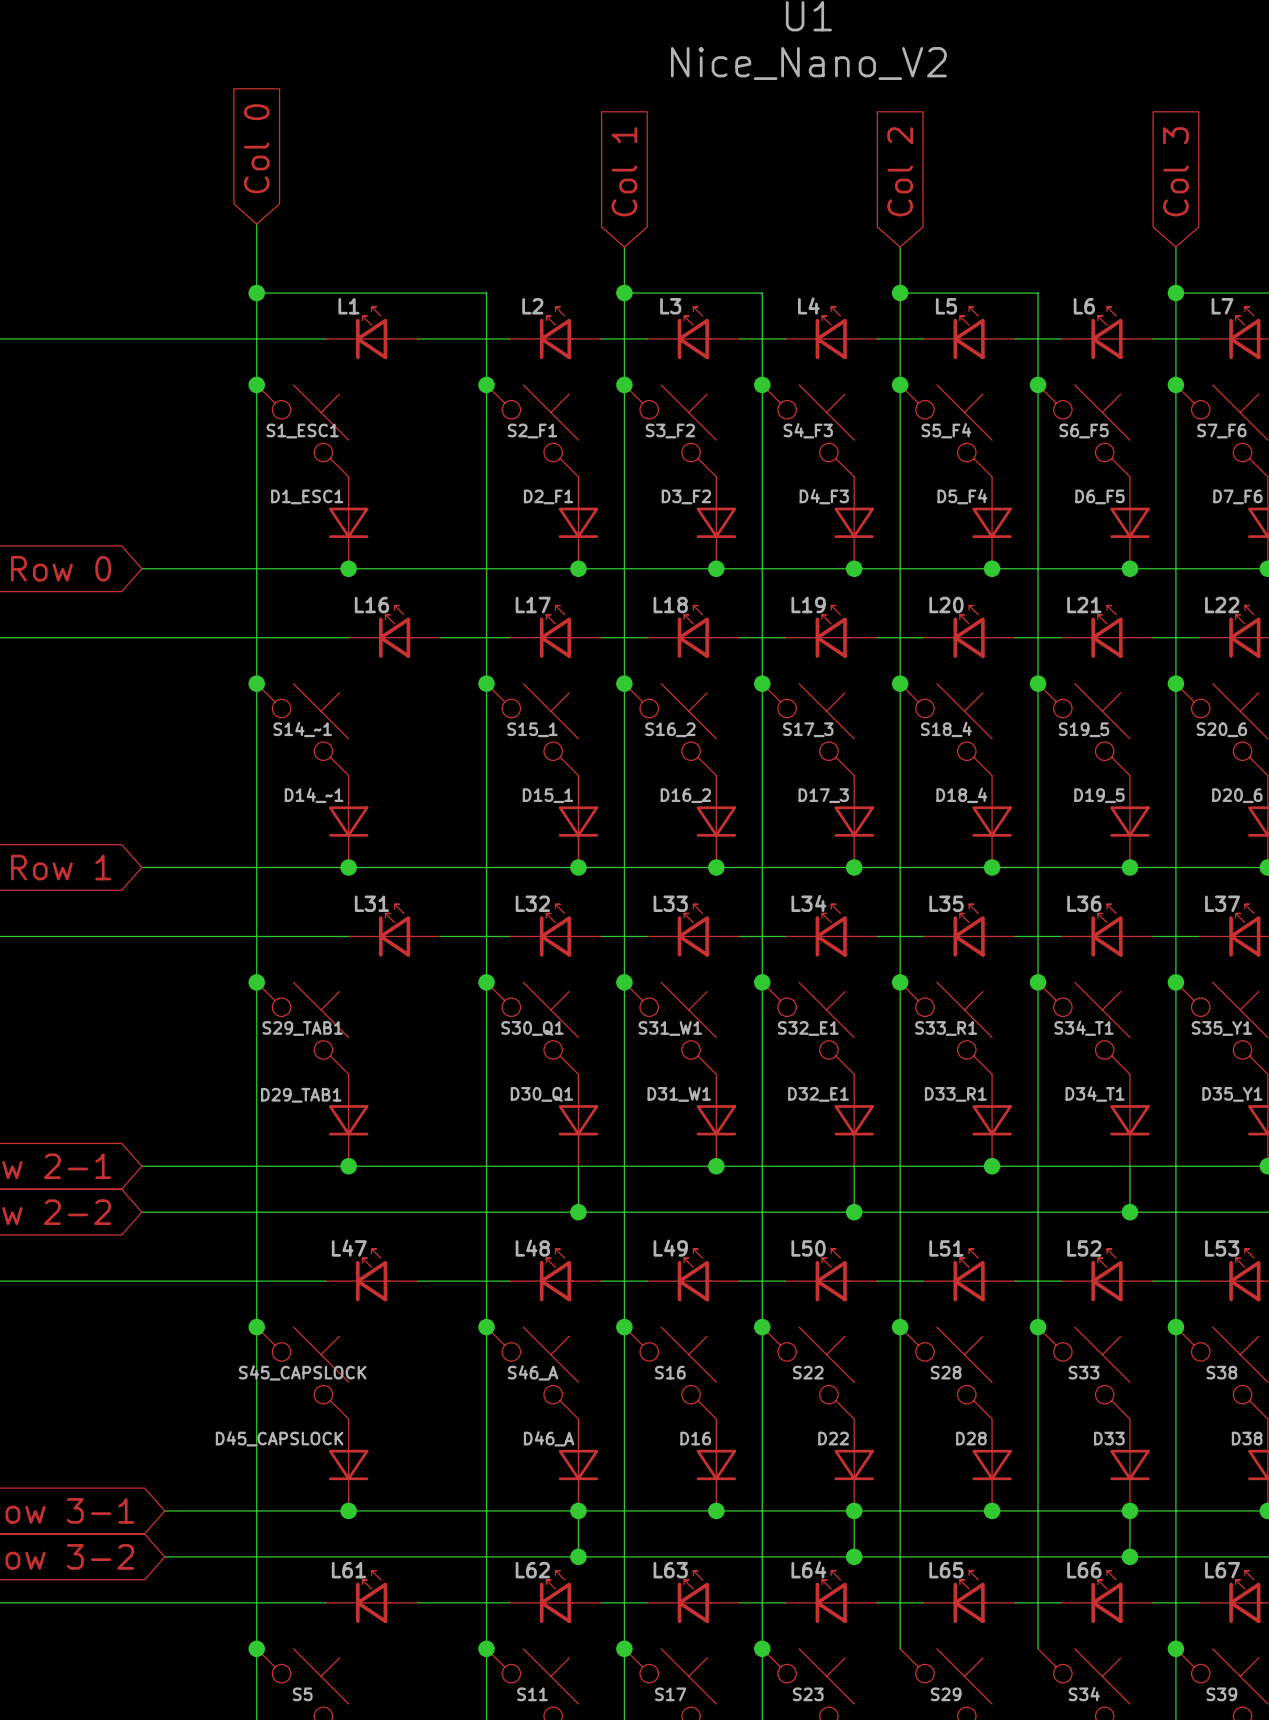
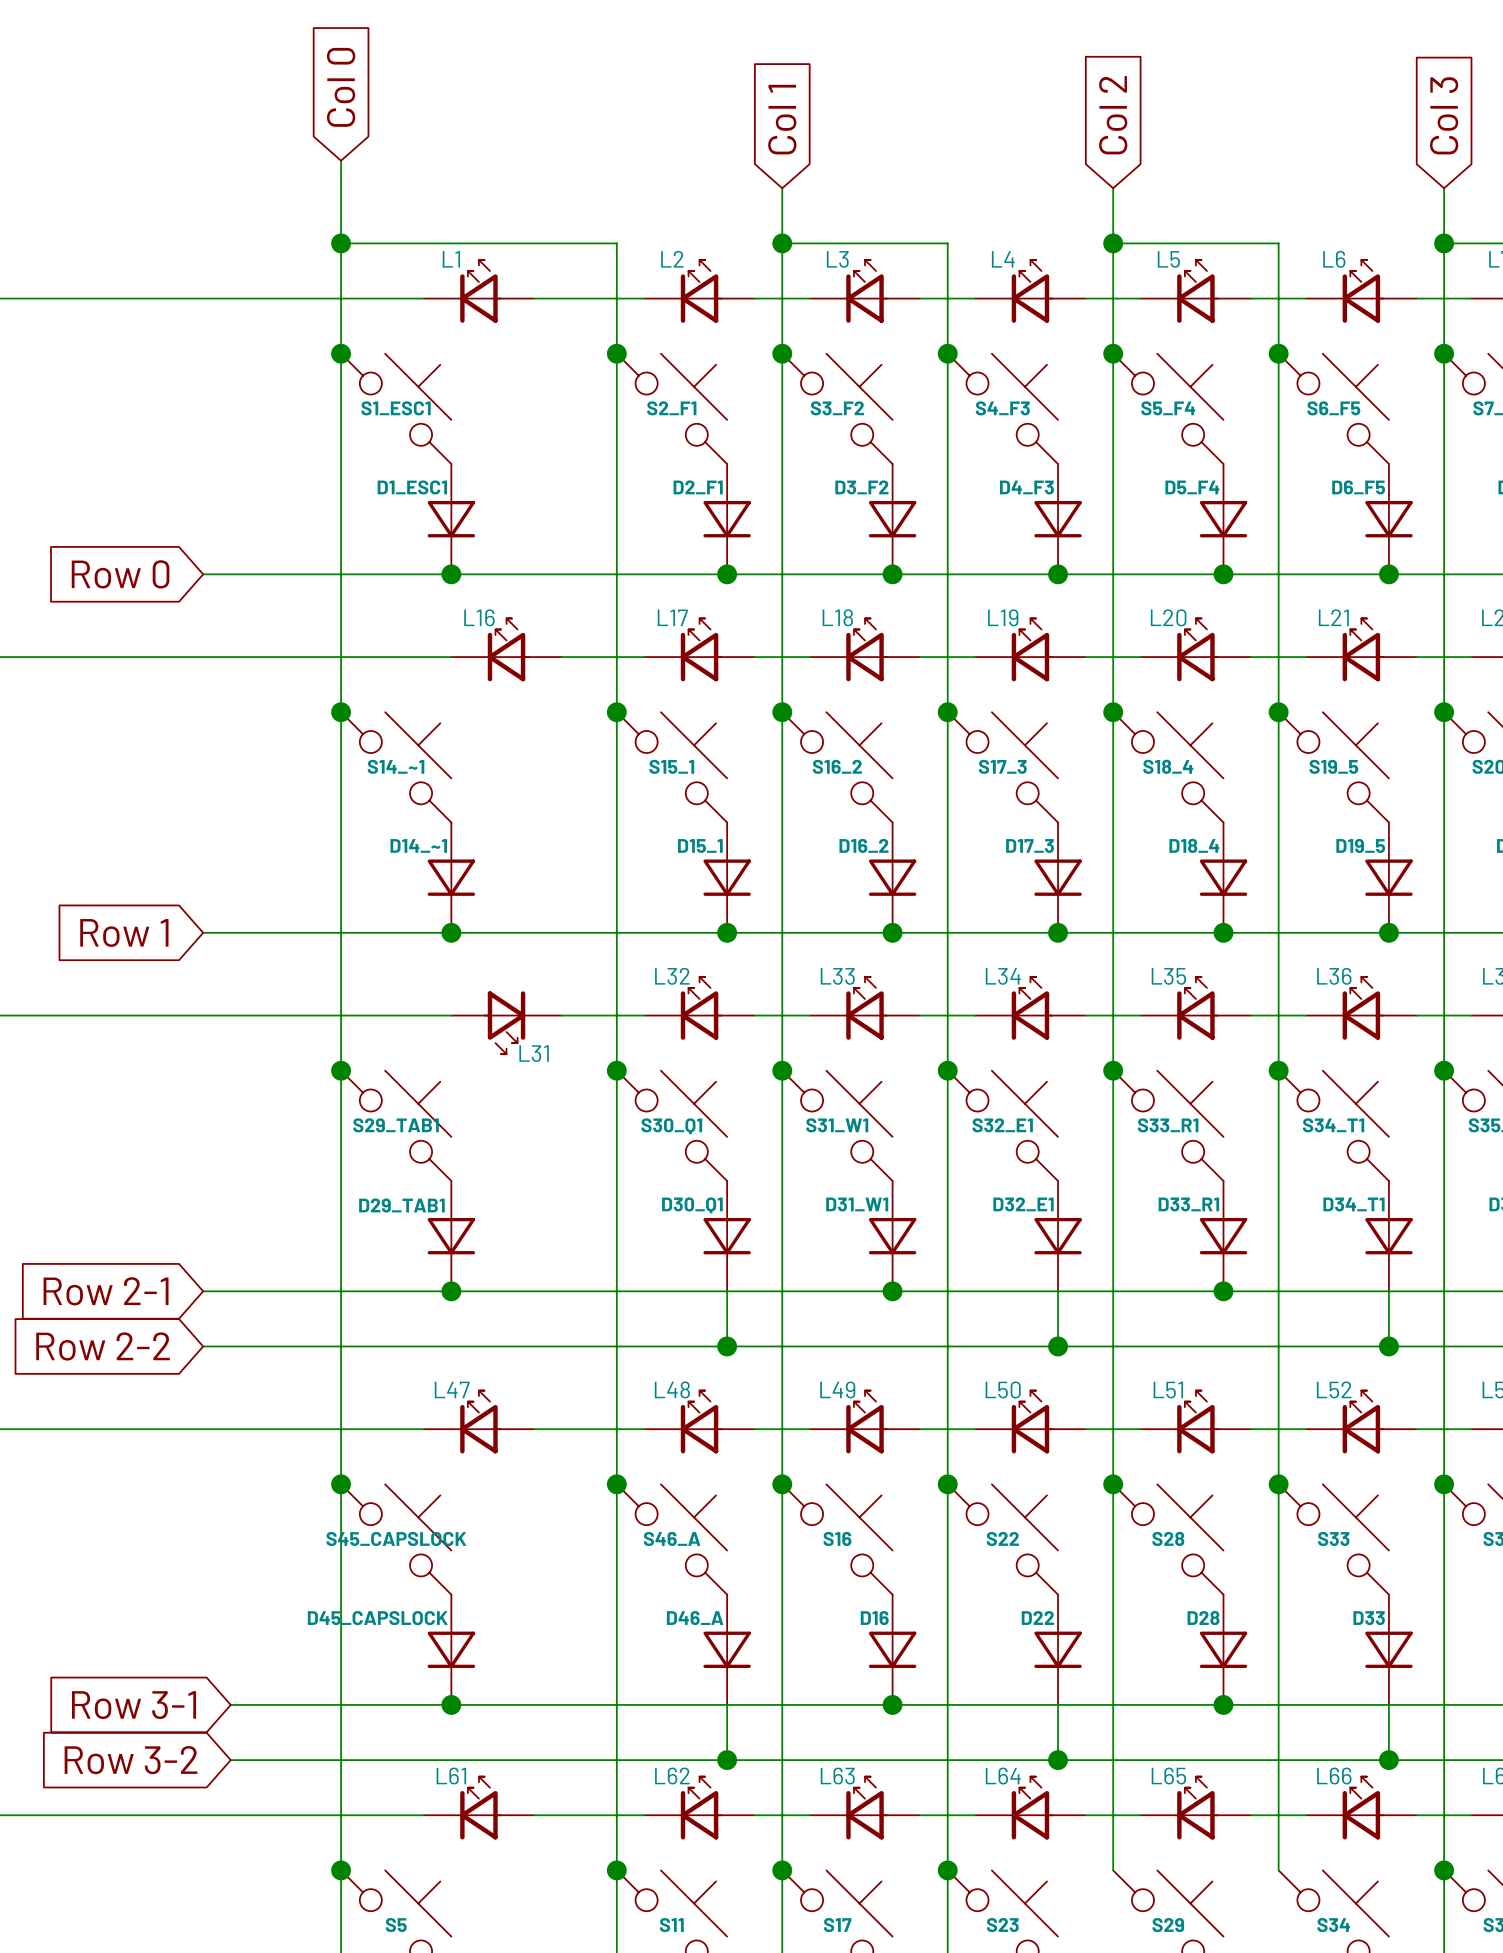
L31 rotation: 0° (395, 930) -> 180° (504, 1022)
junction: (578, 1510) -> none
junction: (854, 1510) -> none
junction: (1129, 1510) -> none

